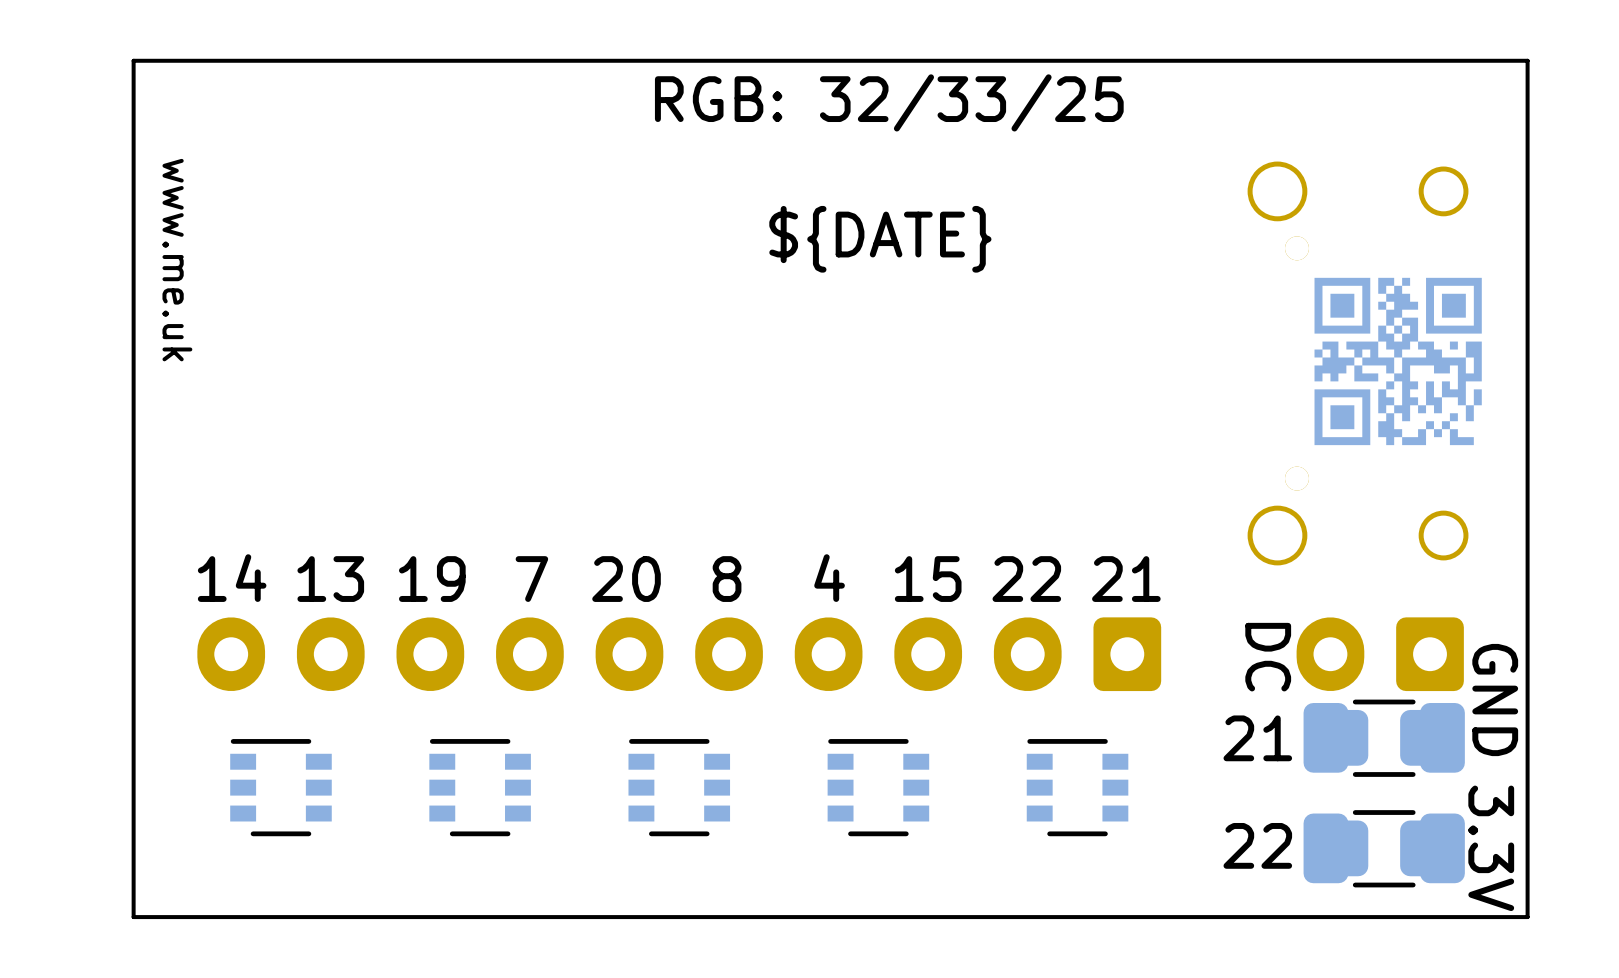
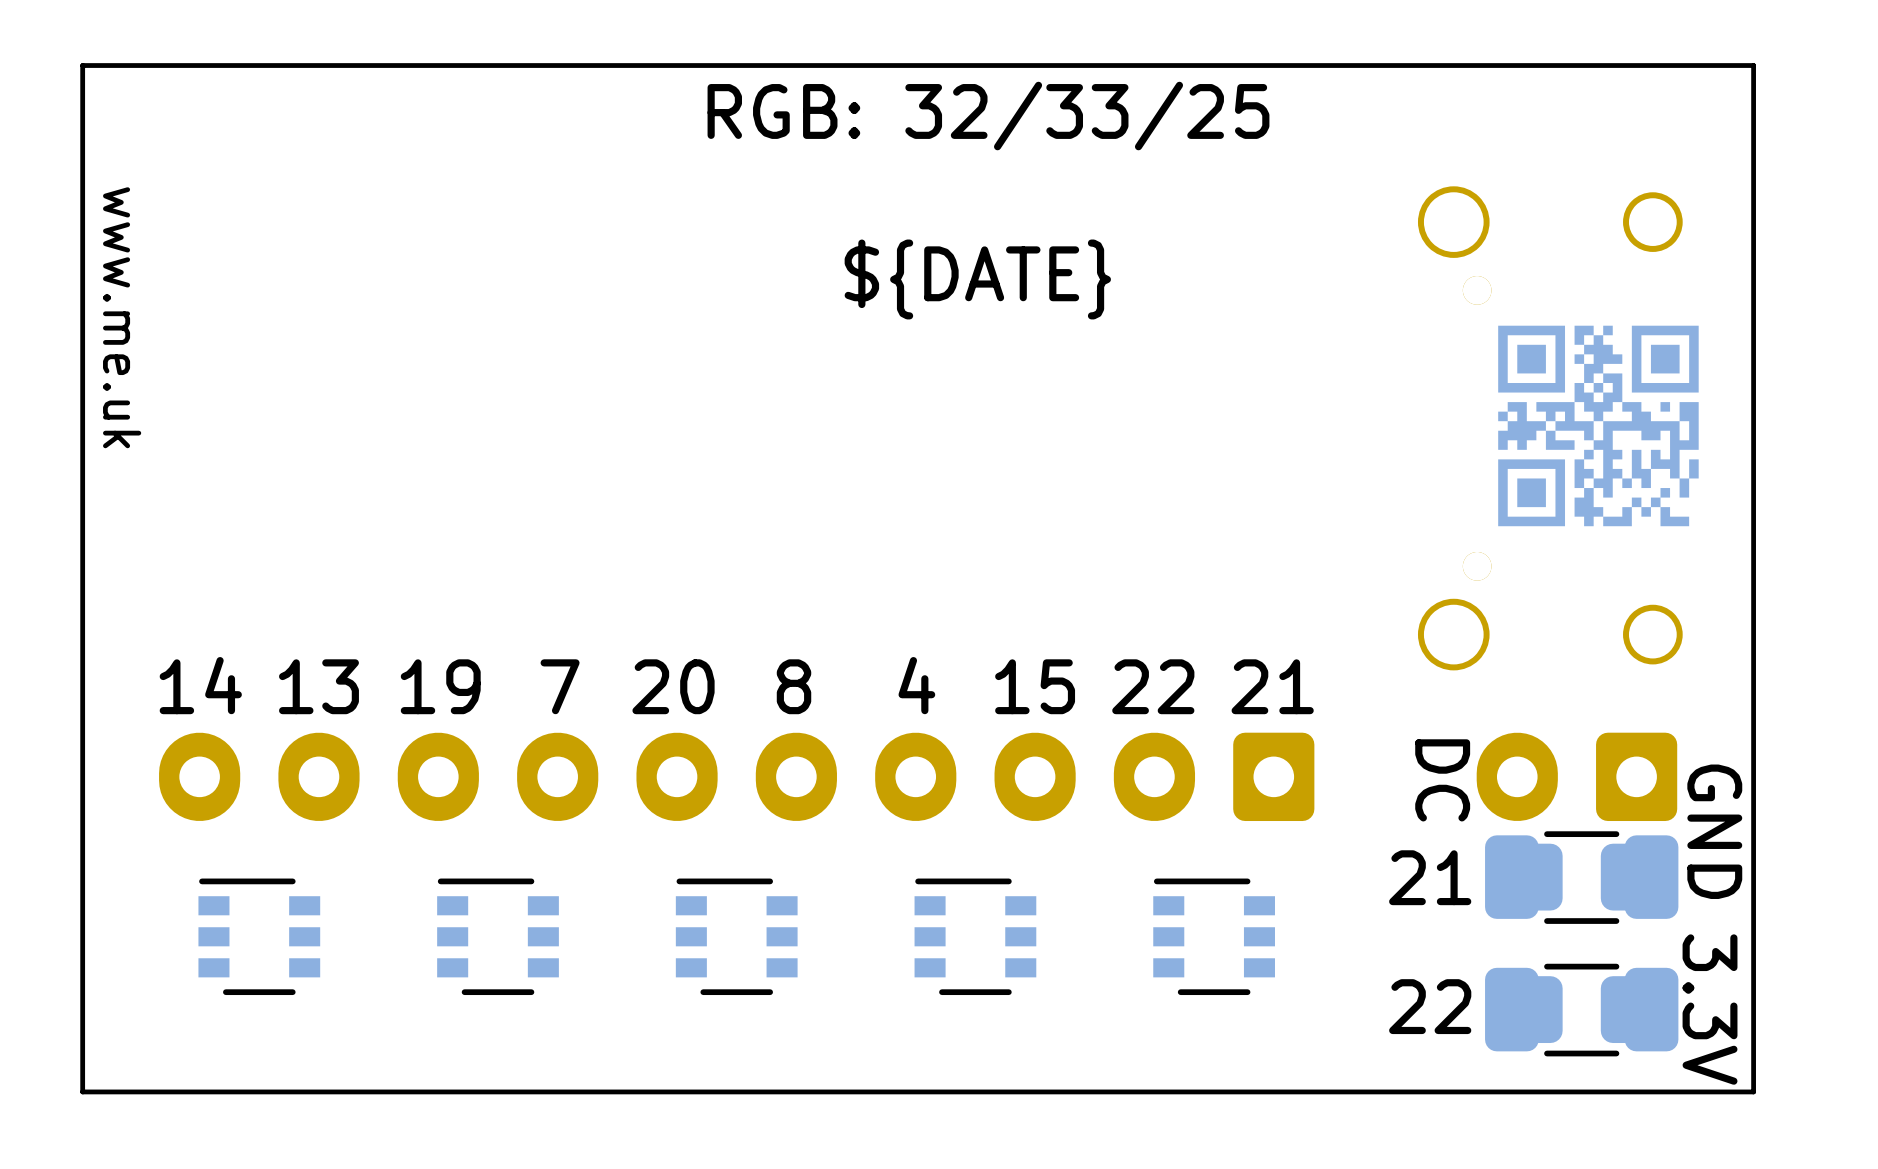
drawing: [162, 158, 193, 362] -> none
text: none -> www.me.uk (122, 317)

